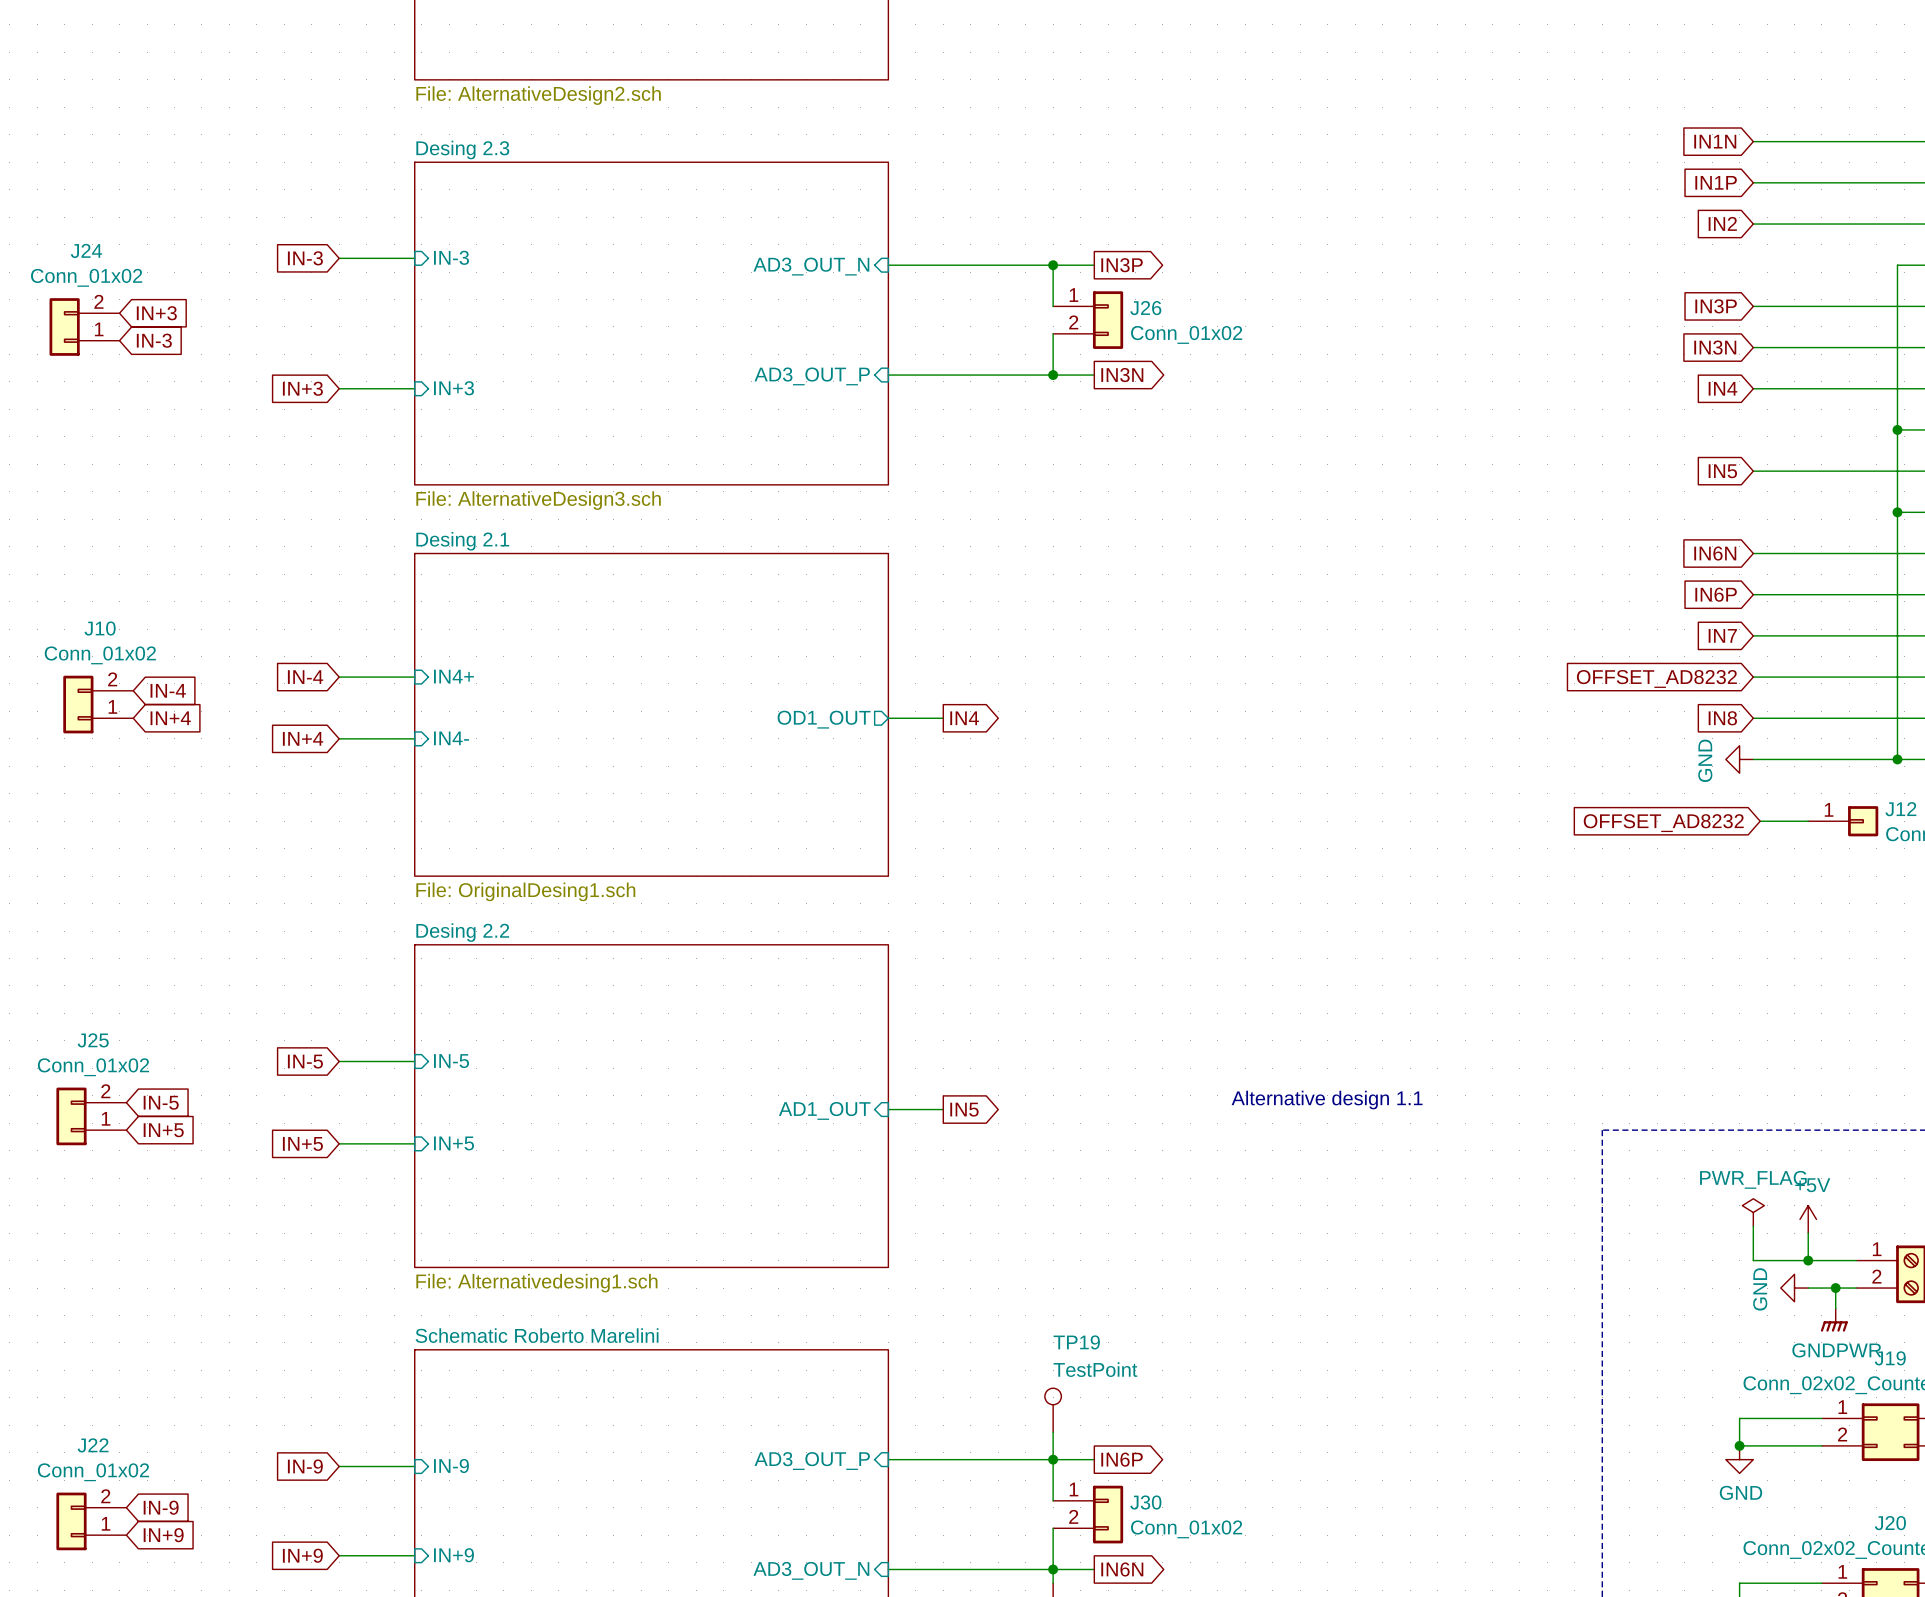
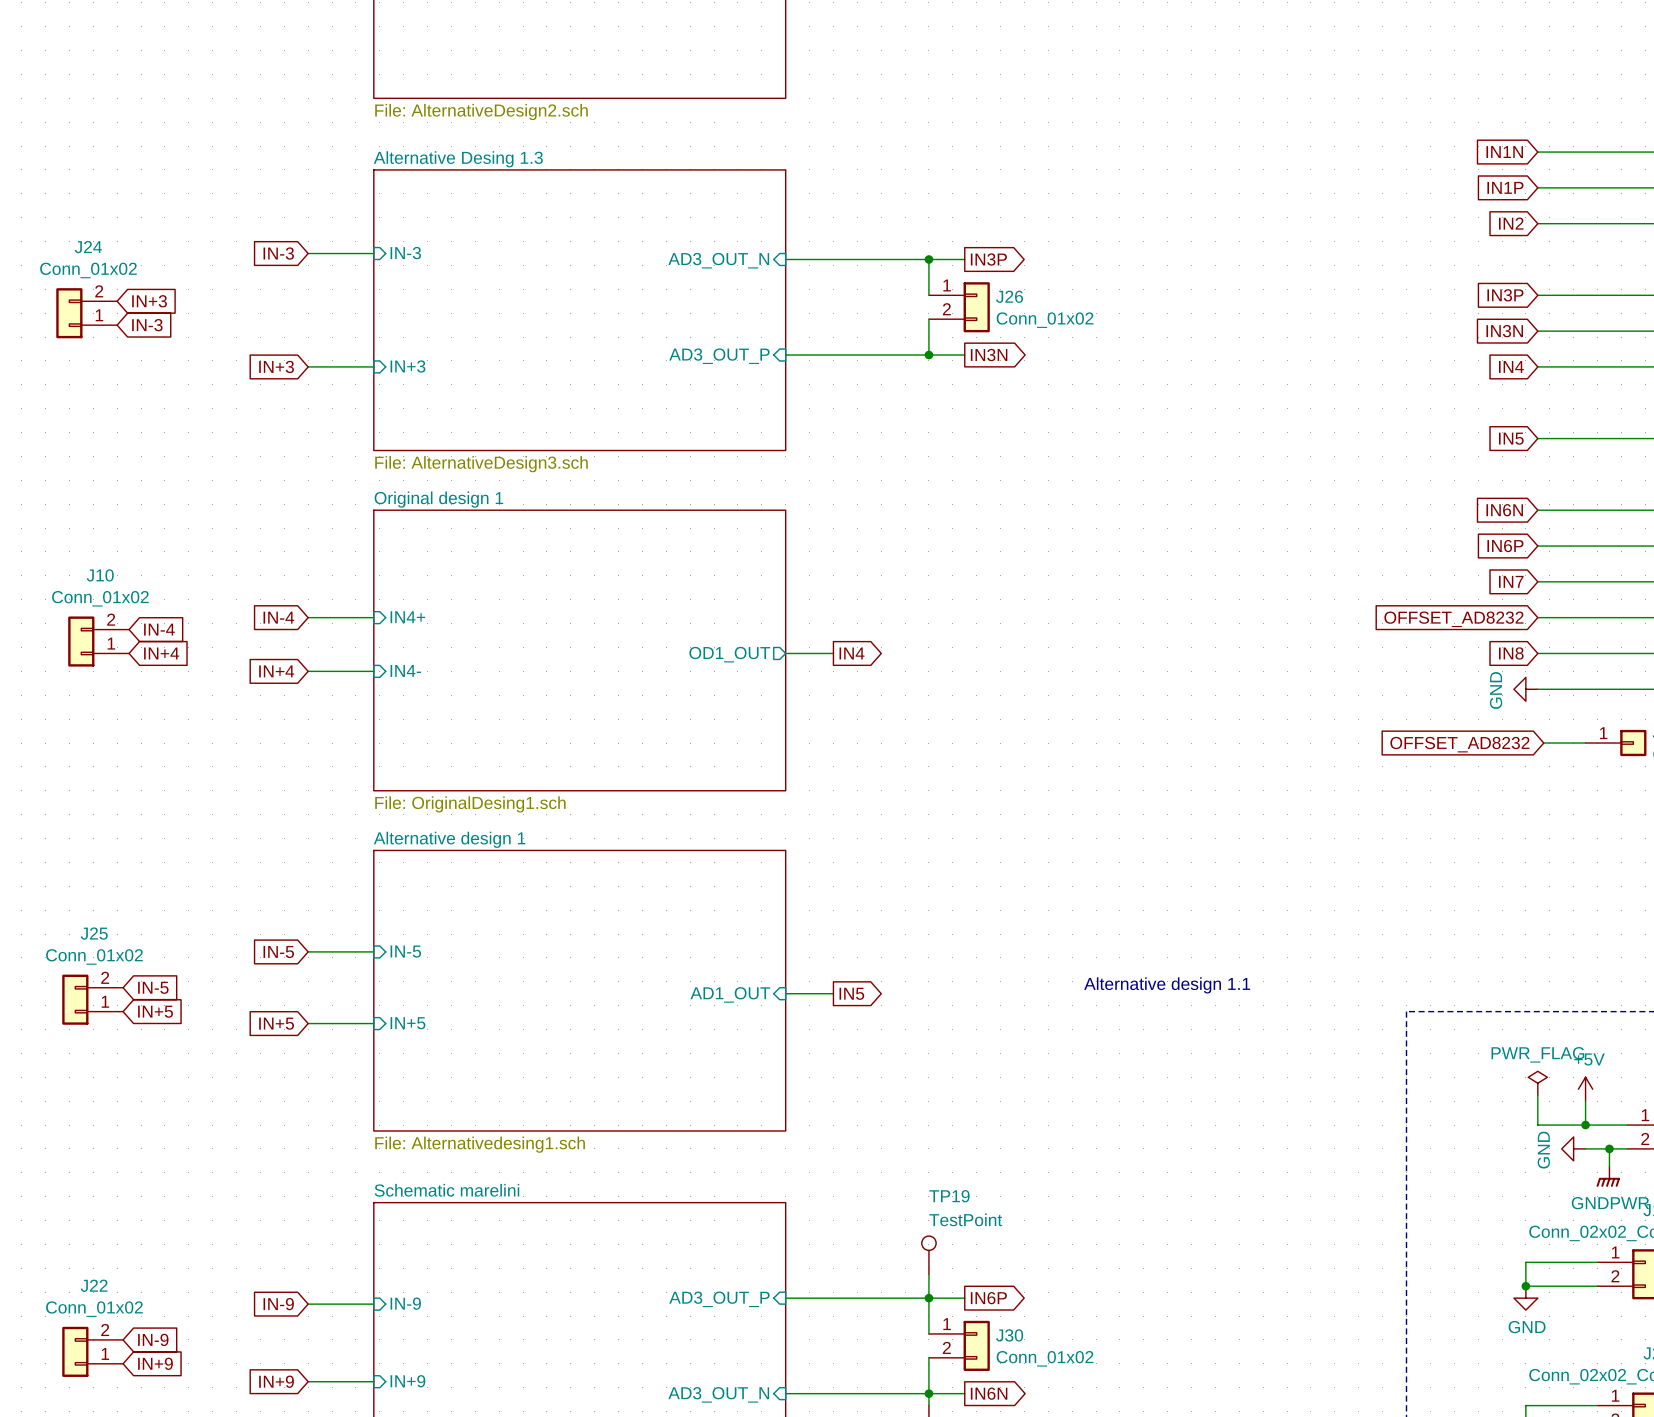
sheet Desing 2.3 name: Desing 2.3 (462, 149) -> Alternative Desing 1.3 (458, 159)
sheet Desing 2.1 name: Desing 2.1 (462, 541) -> Original design 1 (438, 499)
sheet Desing 2.2 name: Desing 2.2 (462, 932) -> Alternative design 1 (449, 839)
sheet Schematic Roberto Marelini name: Schematic Roberto Marelini (537, 1335) -> Schematic marelini (446, 1190)

